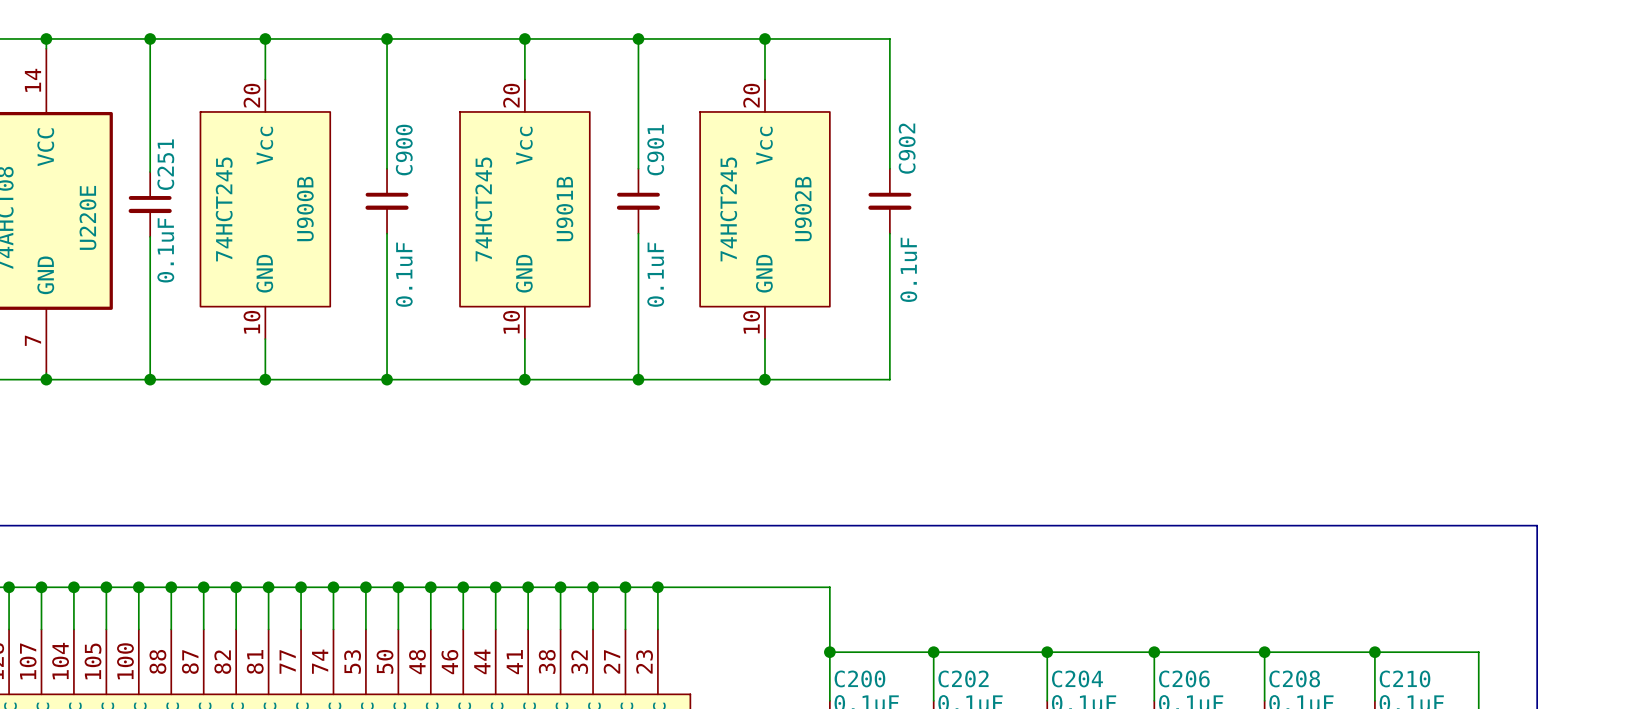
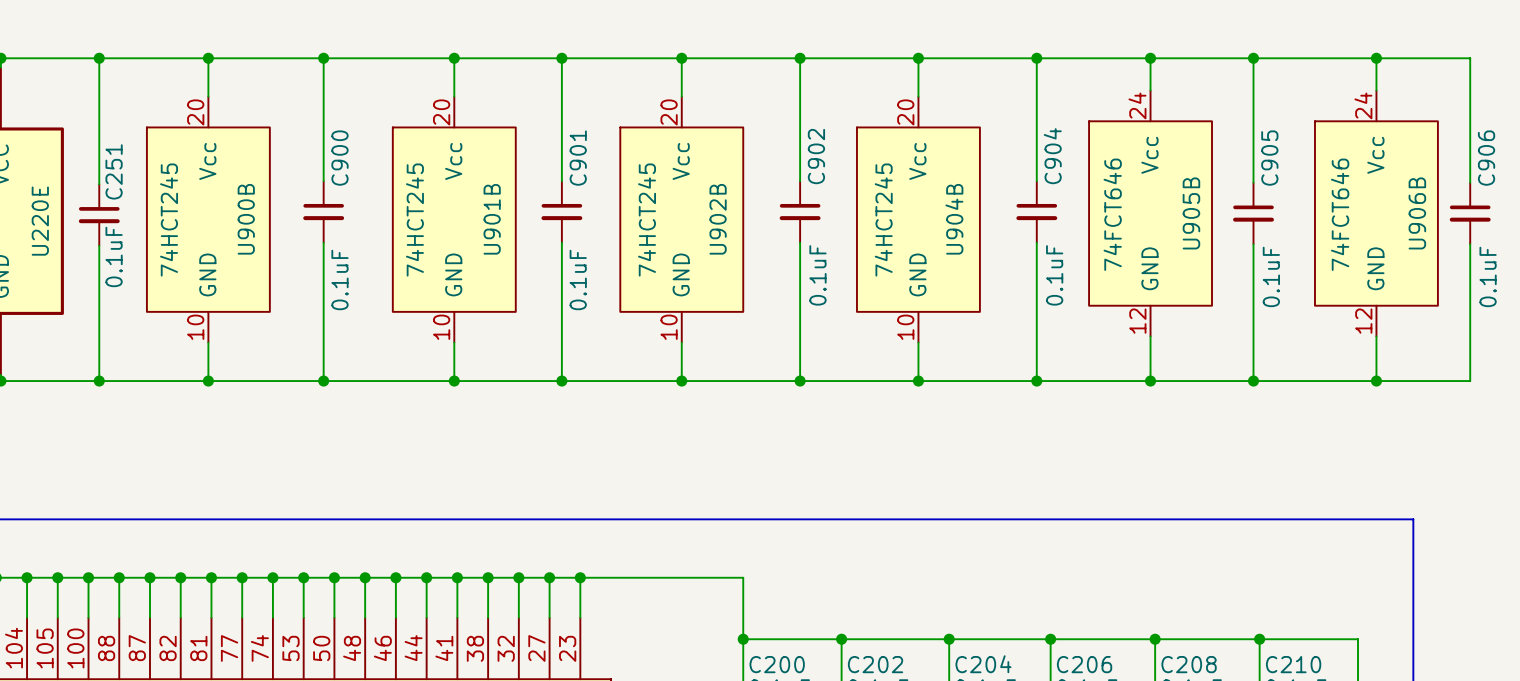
wire: none -> (800, 58) (1470, 58) (1470, 182)
junction: none -> (800, 58)
wire: none -> (918, 58) (918, 96)
junction: none -> (918, 58)
wire: none -> (1036, 58) (1036, 181)
junction: none -> (1036, 58)
wire: none -> (1150, 58) (1150, 90)
junction: none -> (1150, 58)
wire: none -> (1253, 58) (1253, 182)
junction: none -> (1253, 58)
wire: none -> (1376, 58) (1376, 90)
junction: none -> (1376, 58)
C904: none -> 0.1uF (1036, 211)
U905B: none -> 74FCT646 (1150, 213)
C905: none -> 0.1uF (1253, 213)
U906B: none -> 74FCT646 (1376, 213)
C906: none -> 0.1uF (1470, 213)
U904B: none -> 74HCT245 (918, 219)
wire: none -> (1036, 242) (1036, 381)
wire: none -> (1253, 244) (1253, 381)
wire: none -> (1470, 244) (1470, 381) (800, 381)
wire: none -> (1150, 336) (1150, 381)
wire: none -> (1376, 336) (1376, 381)
wire: none -> (918, 342) (918, 381)
junction: none -> (800, 381)
junction: none -> (918, 381)
junction: none -> (1036, 381)
junction: none -> (1150, 381)
junction: none -> (1253, 381)
junction: none -> (1376, 381)

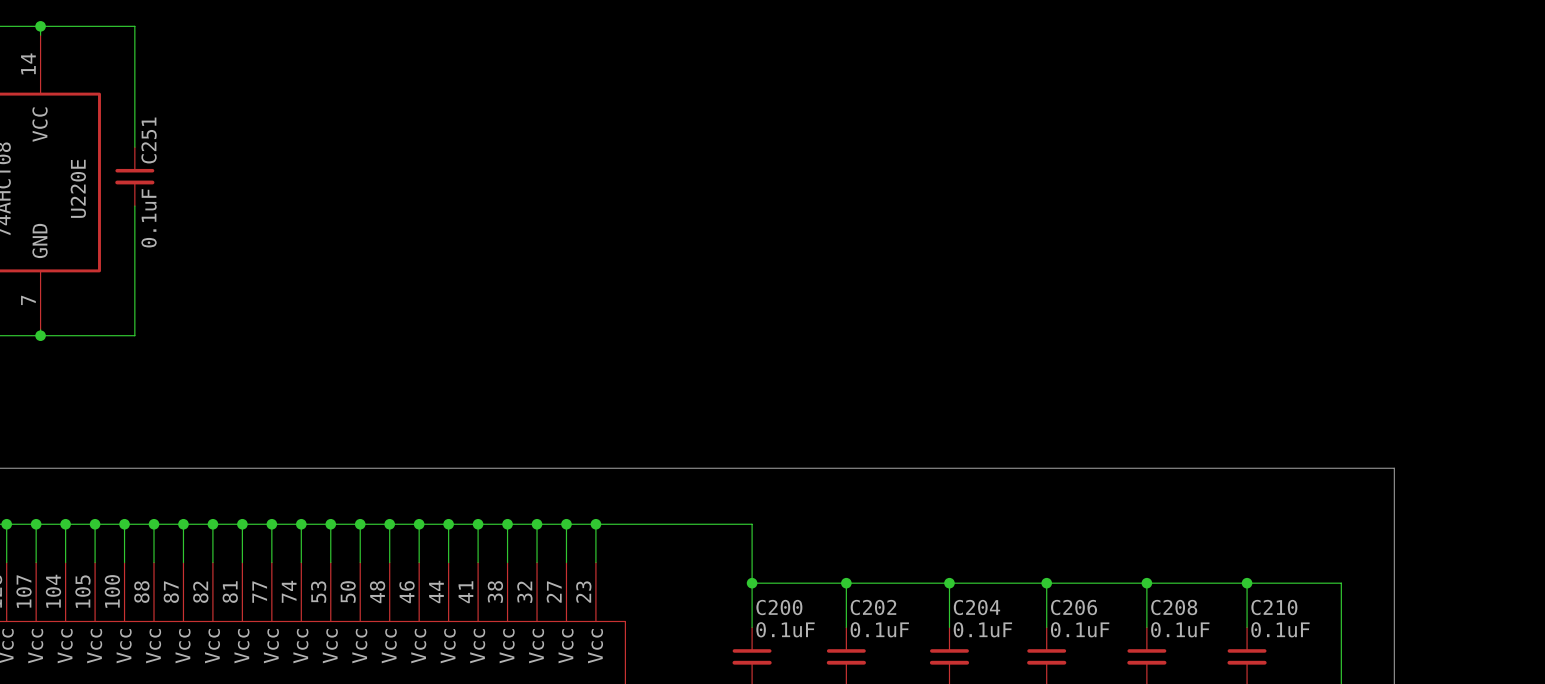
wire: (99, 58) (1470, 58) (1470, 182) -> none
junction: (99, 58) -> none
wire: (208, 58) (208, 96) -> none
junction: (208, 58) -> none
wire: (323, 58) (323, 181) -> none
junction: (323, 58) -> none
wire: (454, 58) (454, 96) -> none
junction: (454, 58) -> none
wire: (561, 58) (561, 181) -> none
junction: (561, 58) -> none
wire: (681, 58) (681, 96) -> none
junction: (681, 58) -> none
wire: (800, 58) (800, 181) -> none
junction: (800, 58) -> none
wire: (918, 58) (918, 96) -> none
junction: (918, 58) -> none
wire: (1036, 58) (1036, 181) -> none
junction: (1036, 58) -> none
wire: (1150, 58) (1150, 90) -> none
junction: (1150, 58) -> none
wire: (1253, 58) (1253, 182) -> none
junction: (1253, 58) -> none
wire: (1376, 58) (1376, 90) -> none
junction: (1376, 58) -> none
C900: 0.1uF (323, 211) -> none
C901: 0.1uF (561, 211) -> none
C902: 0.1uF (800, 211) -> none
C904: 0.1uF (1036, 211) -> none
U905B: 74FCT646 (1150, 213) -> none
C905: 0.1uF (1253, 213) -> none
U906B: 74FCT646 (1376, 213) -> none
C906: 0.1uF (1470, 213) -> none
U900B: 74HCT245 (208, 219) -> none
U901B: 74HCT245 (454, 219) -> none
U902B: 74HCT245 (681, 219) -> none
U904B: 74HCT245 (918, 219) -> none
wire: (323, 242) (323, 381) -> none
wire: (561, 242) (561, 381) -> none
wire: (800, 242) (800, 381) -> none
wire: (1036, 242) (1036, 381) -> none
wire: (1253, 244) (1253, 381) -> none
wire: (1470, 244) (1470, 381) (99, 381) -> none
wire: (1150, 336) (1150, 381) -> none
wire: (1376, 336) (1376, 381) -> none
wire: (208, 342) (208, 381) -> none
wire: (454, 342) (454, 381) -> none
wire: (681, 342) (681, 381) -> none
wire: (918, 342) (918, 381) -> none
junction: (99, 381) -> none
junction: (208, 381) -> none
junction: (323, 381) -> none
junction: (454, 381) -> none
junction: (561, 381) -> none
junction: (681, 381) -> none
junction: (800, 381) -> none
junction: (918, 381) -> none
junction: (1036, 381) -> none
junction: (1150, 381) -> none
junction: (1253, 381) -> none
junction: (1376, 381) -> none

